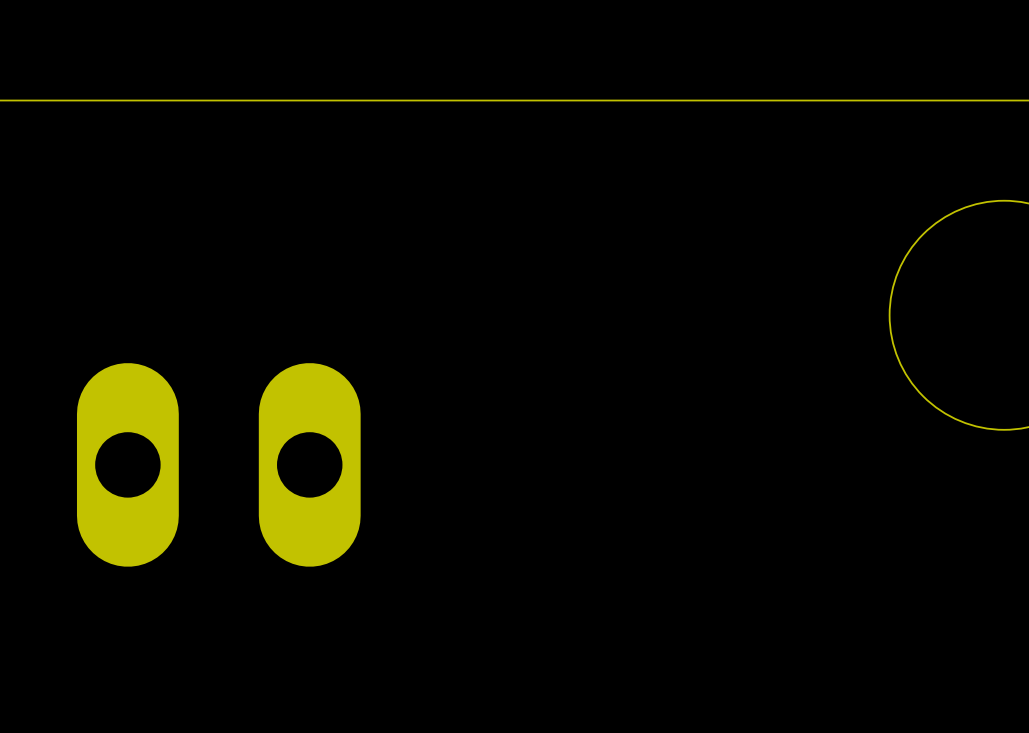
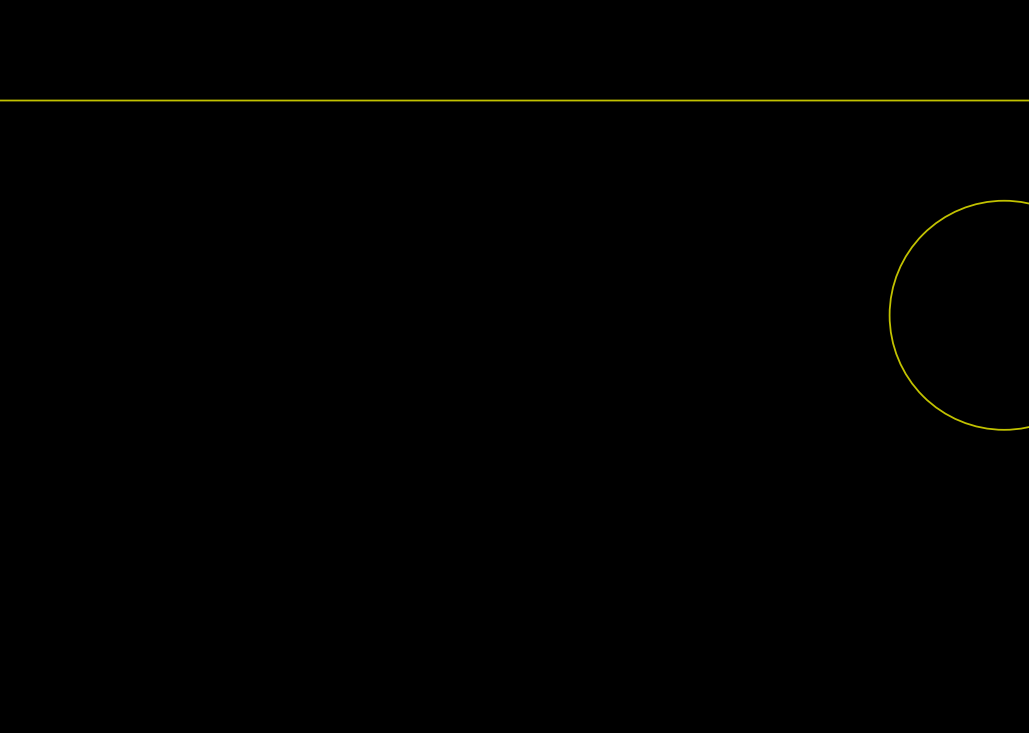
part: (218, 464) -> none

